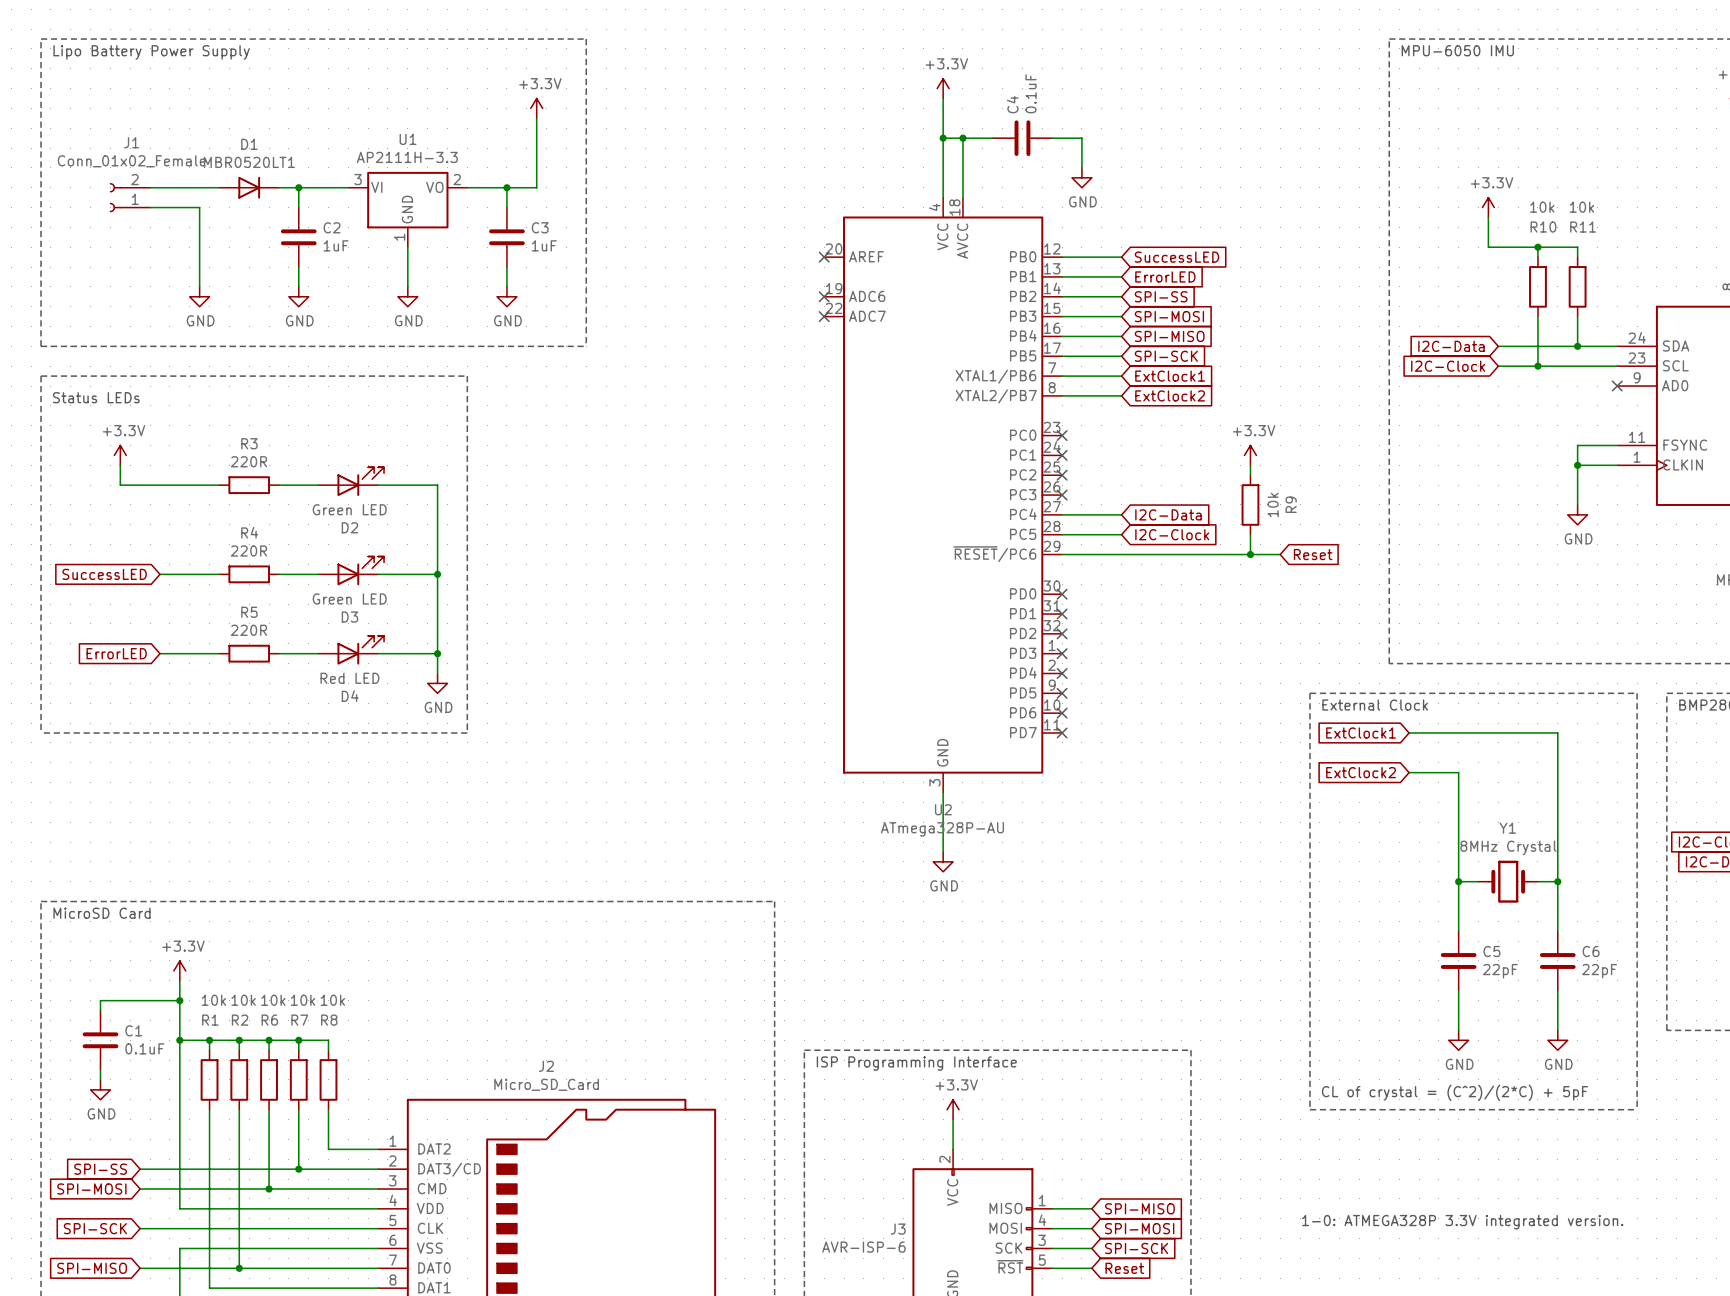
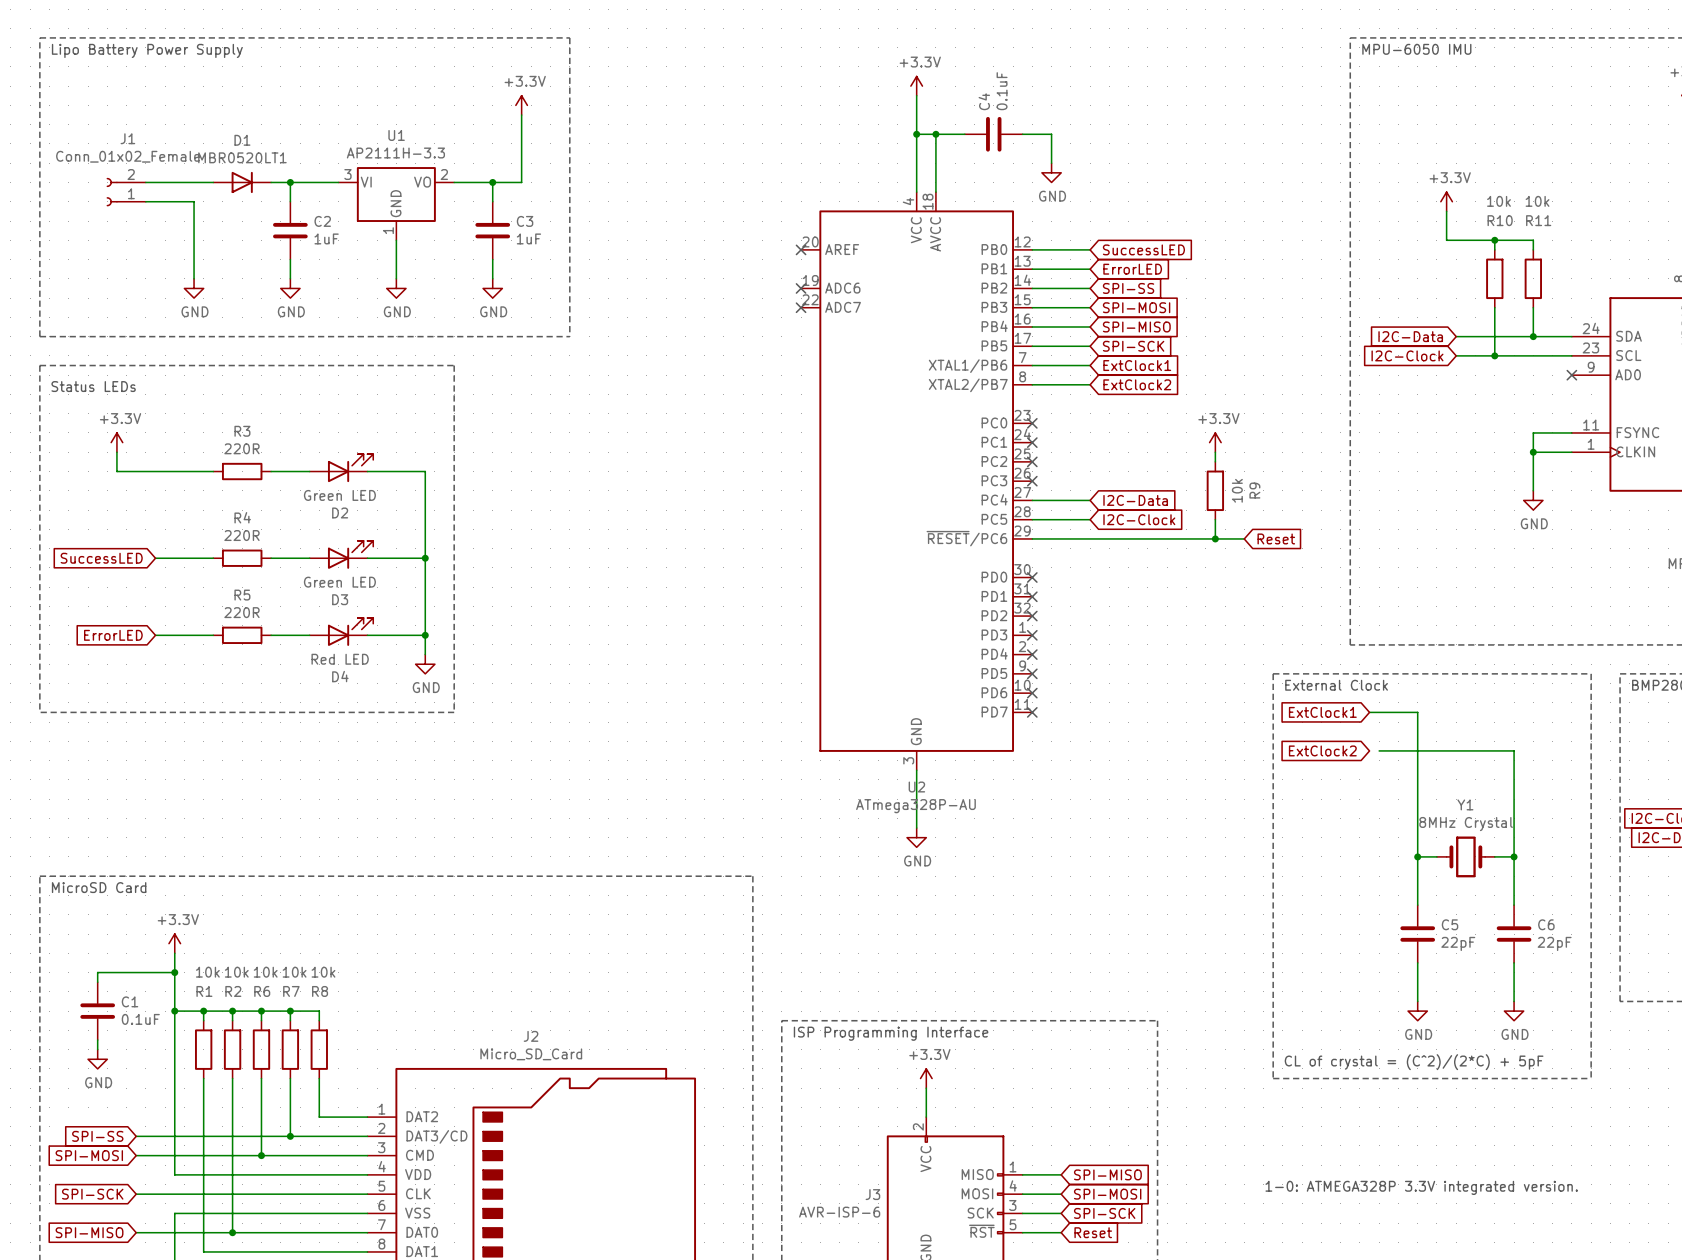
wire: (1458, 732) (1557, 732) (1557, 772) -> (1417, 712) (1417, 750) (1514, 750)
wire: (1409, 772) (1419, 772) -> none

